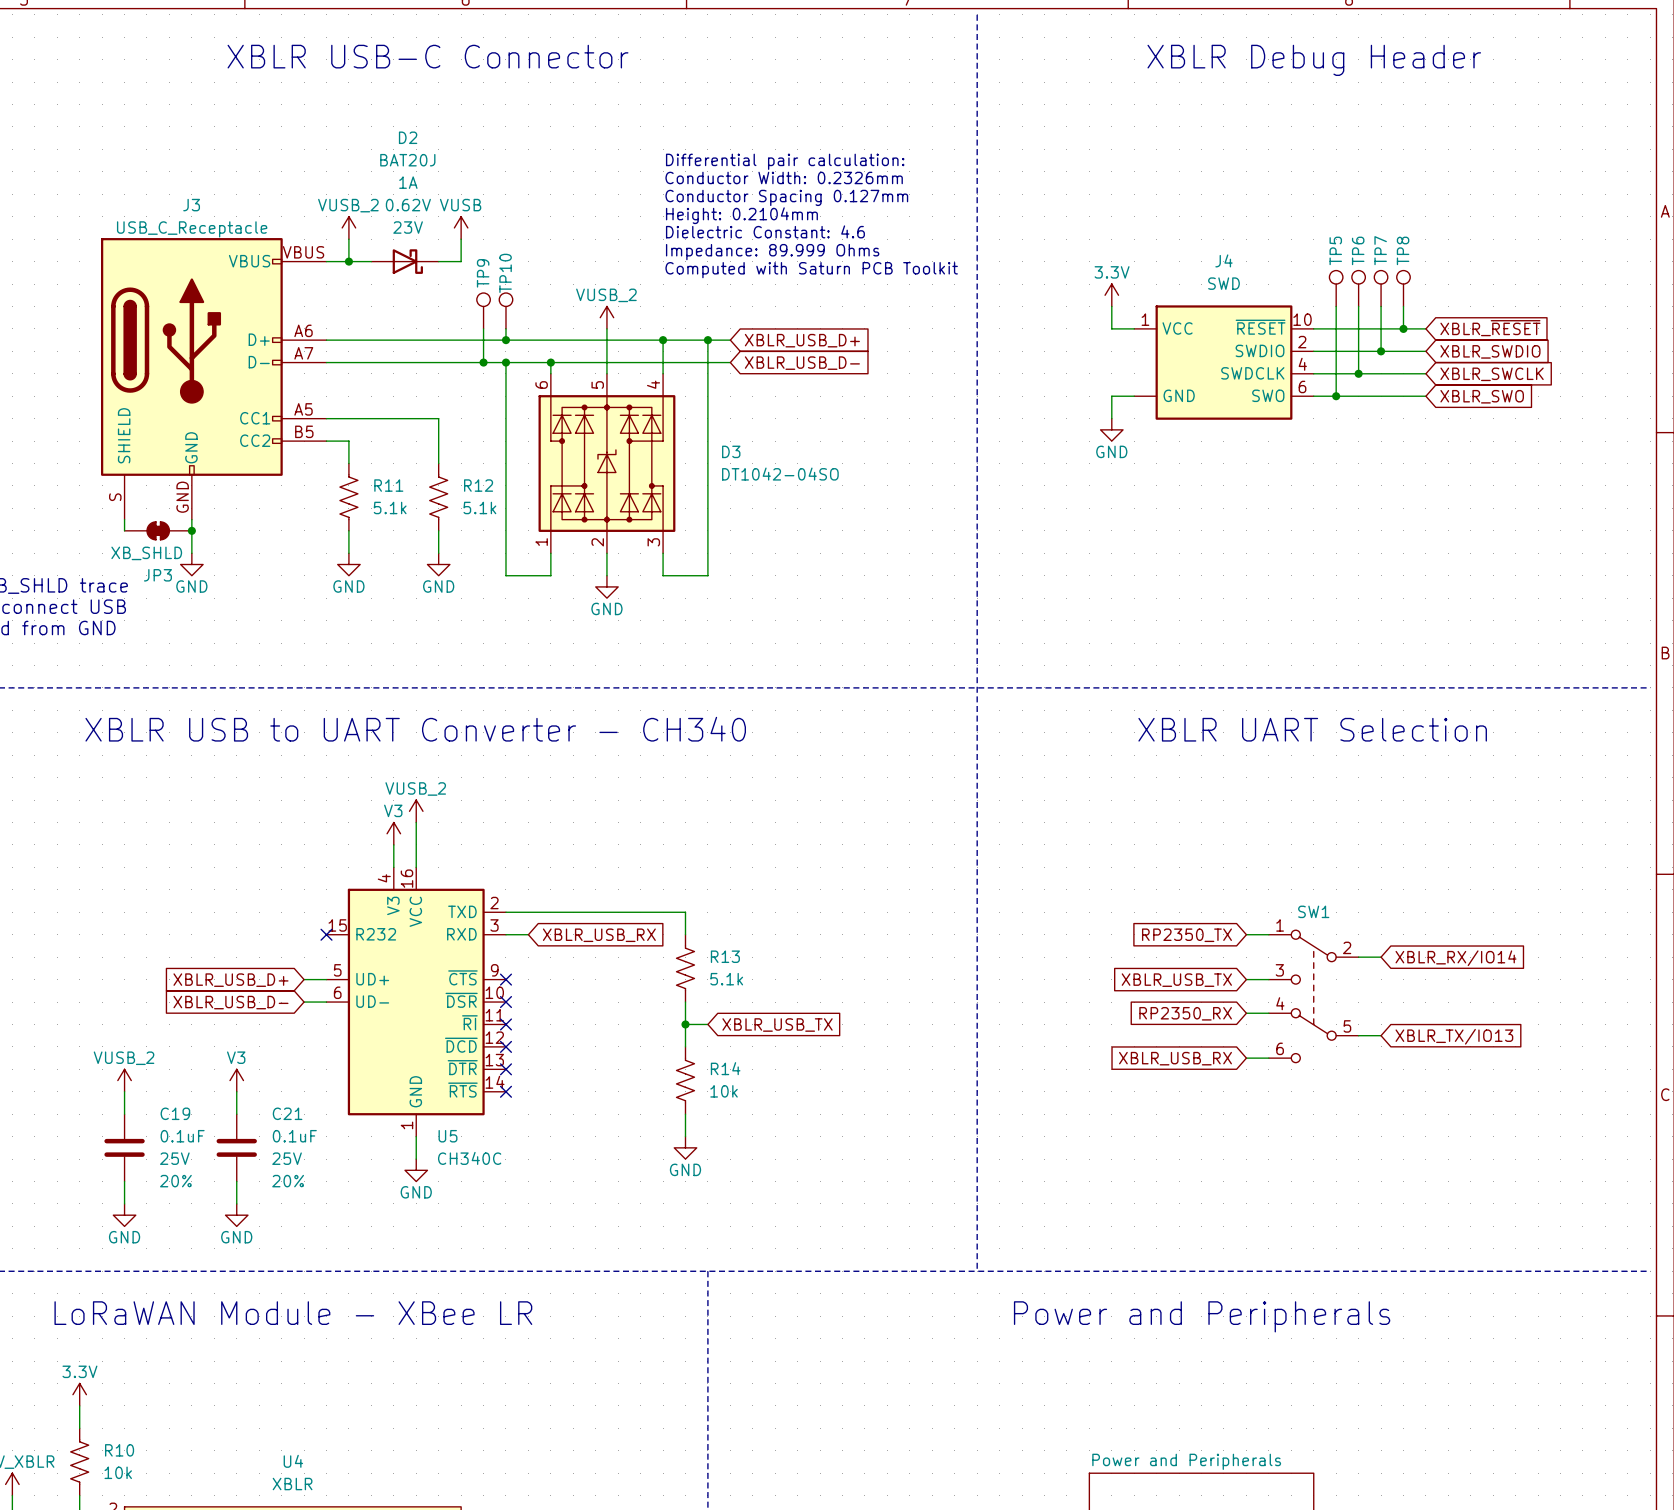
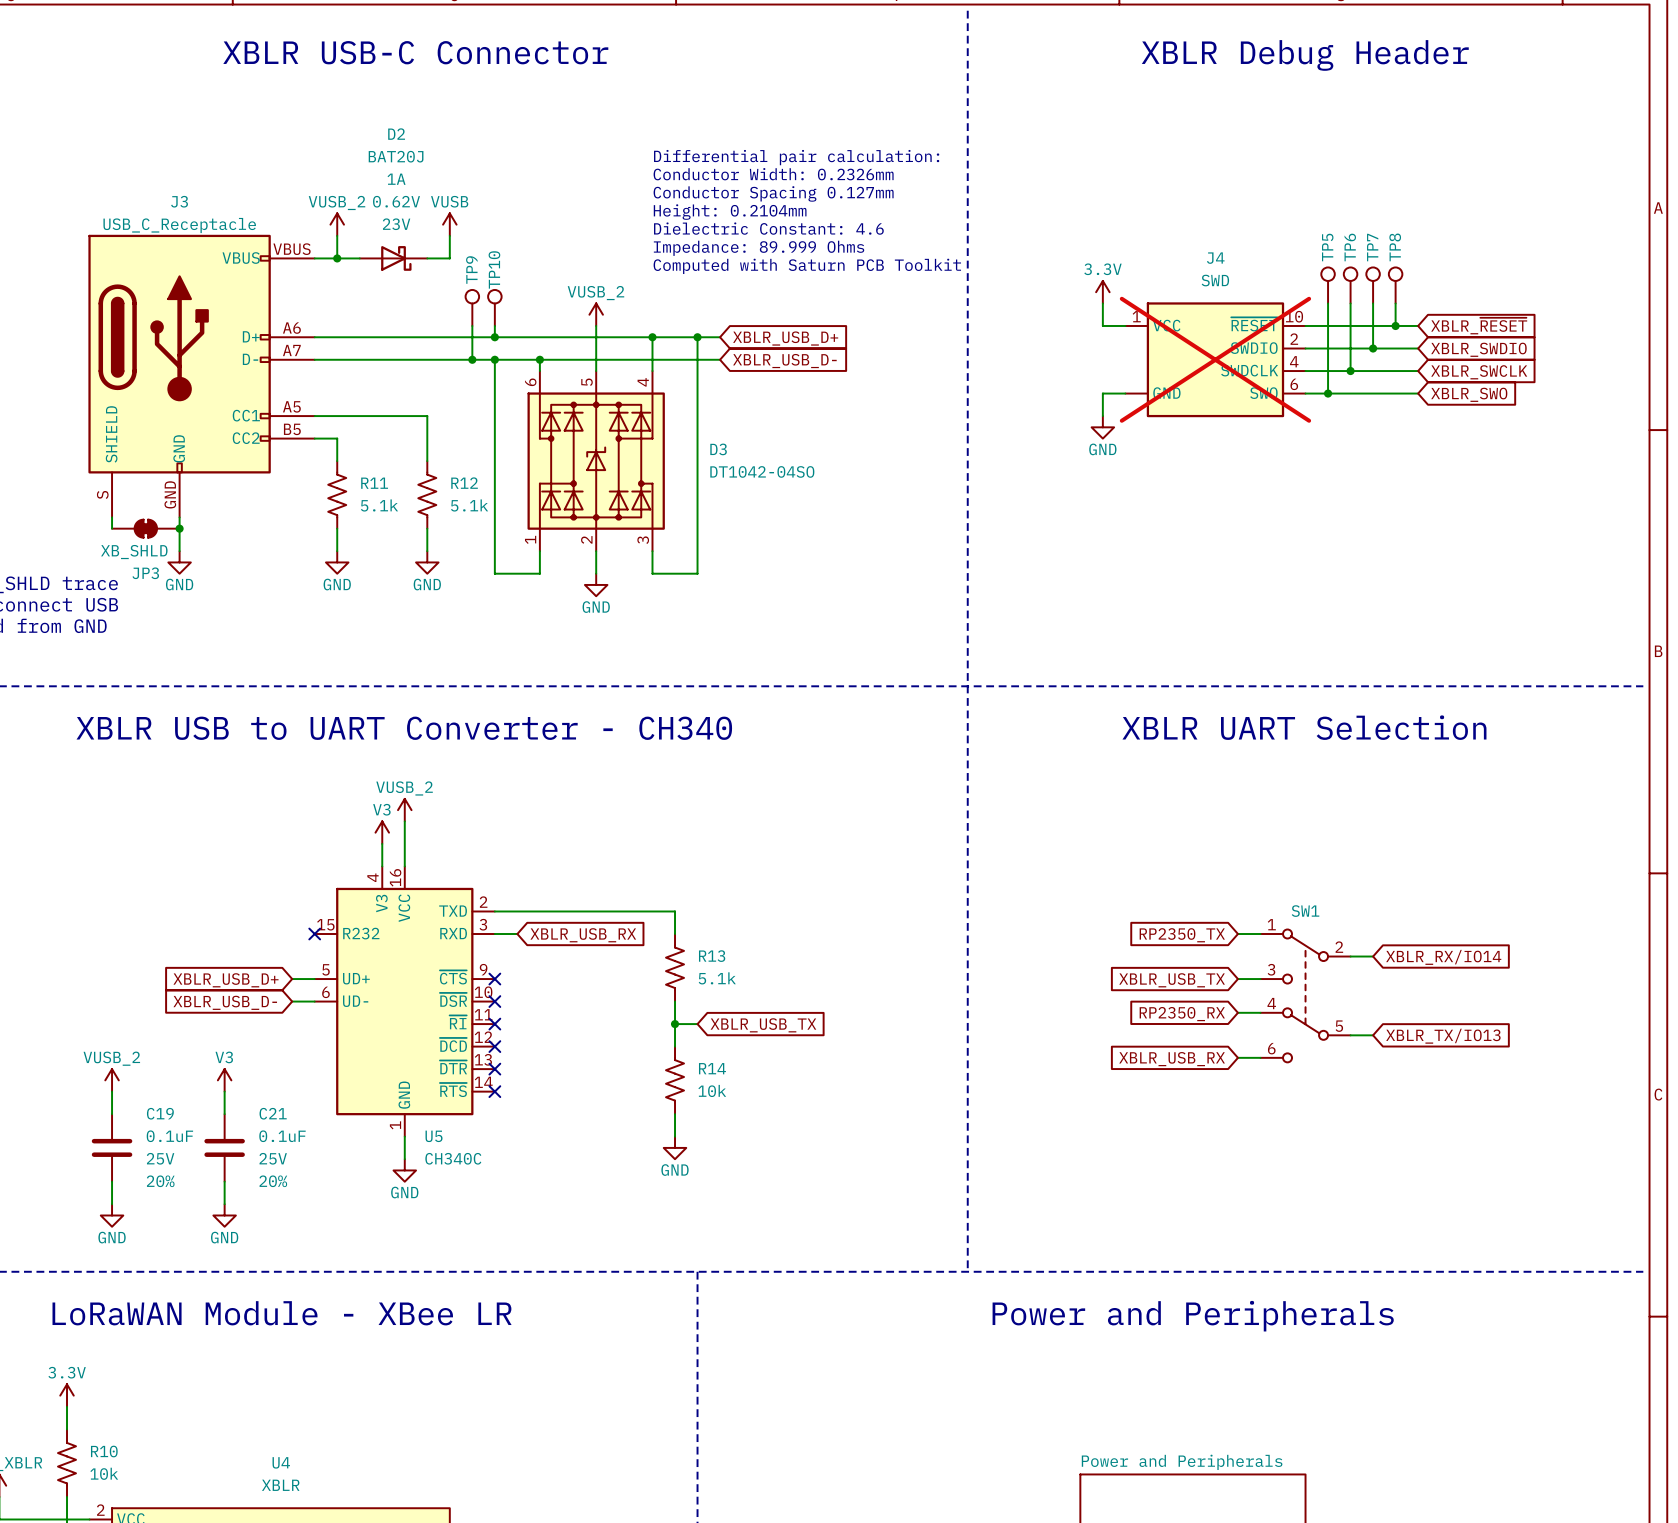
J4 do-not-place cross: none -> (1215, 359)

